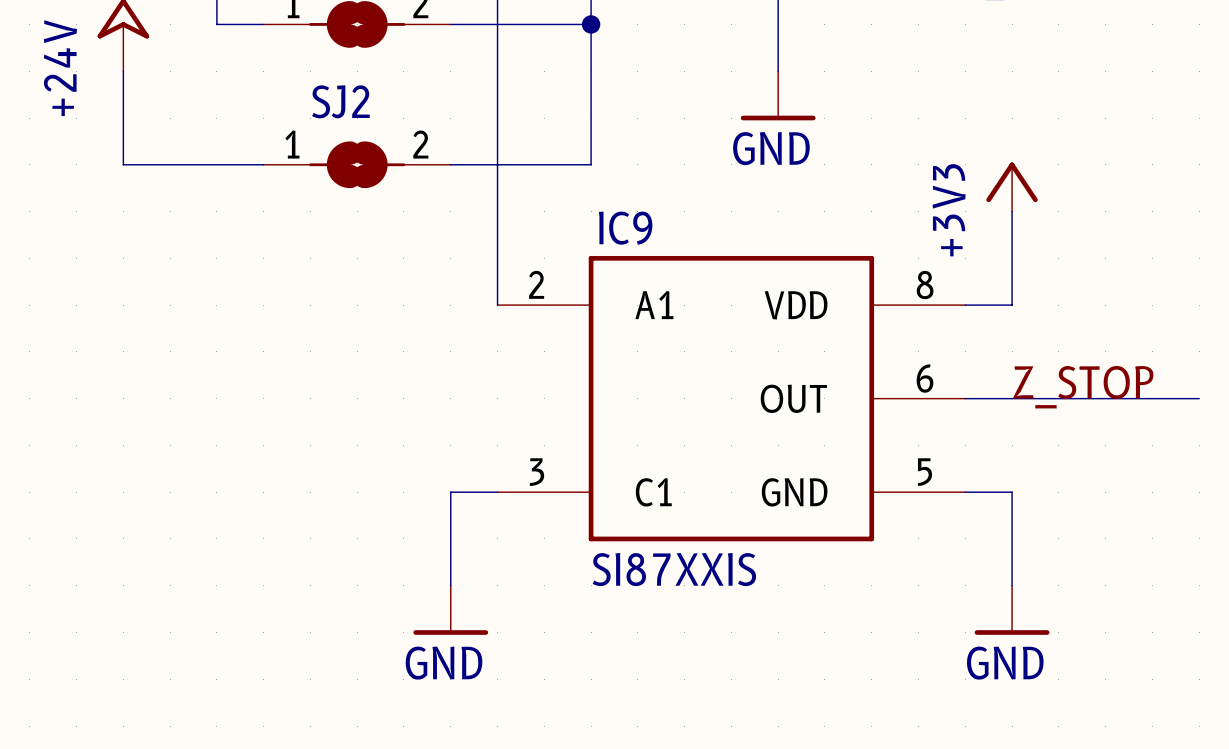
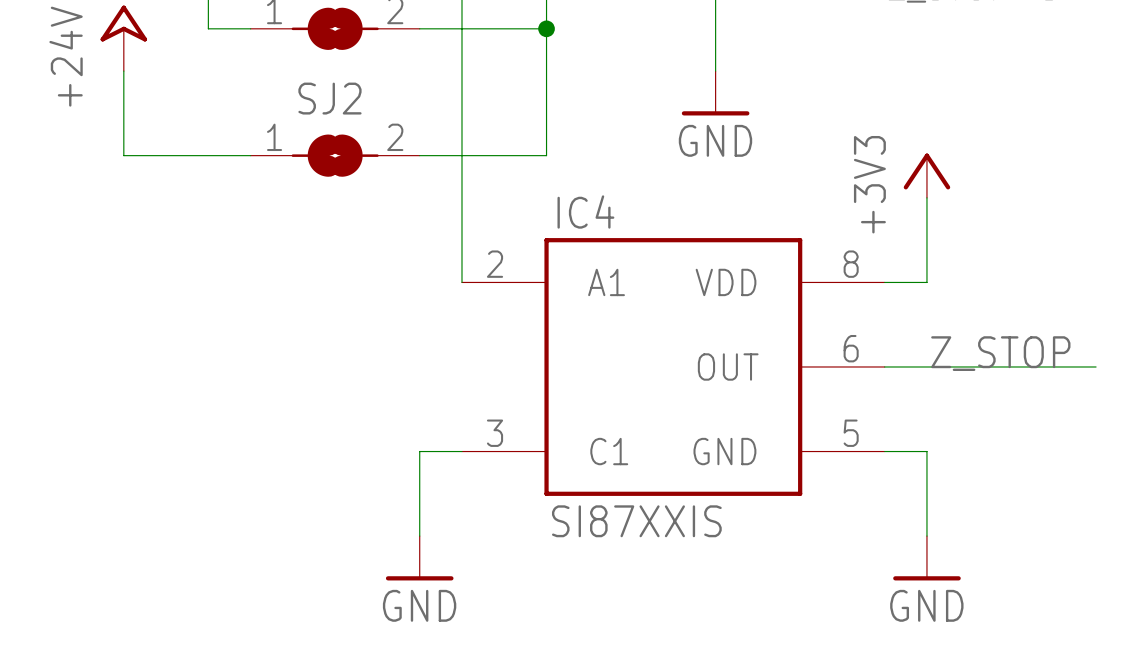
IC9 name: IC9 (625, 228) -> IC4 (585, 212)

